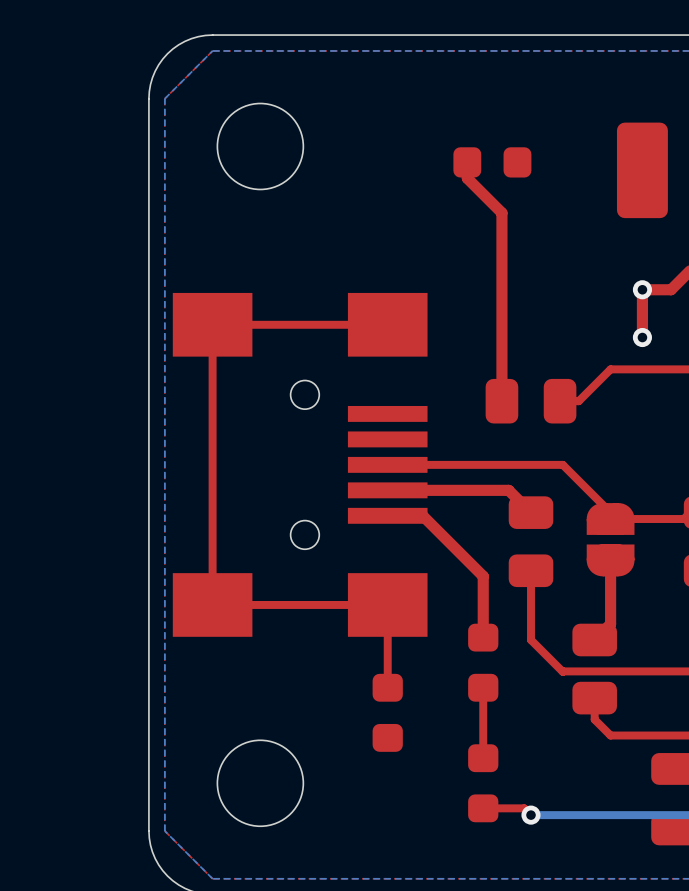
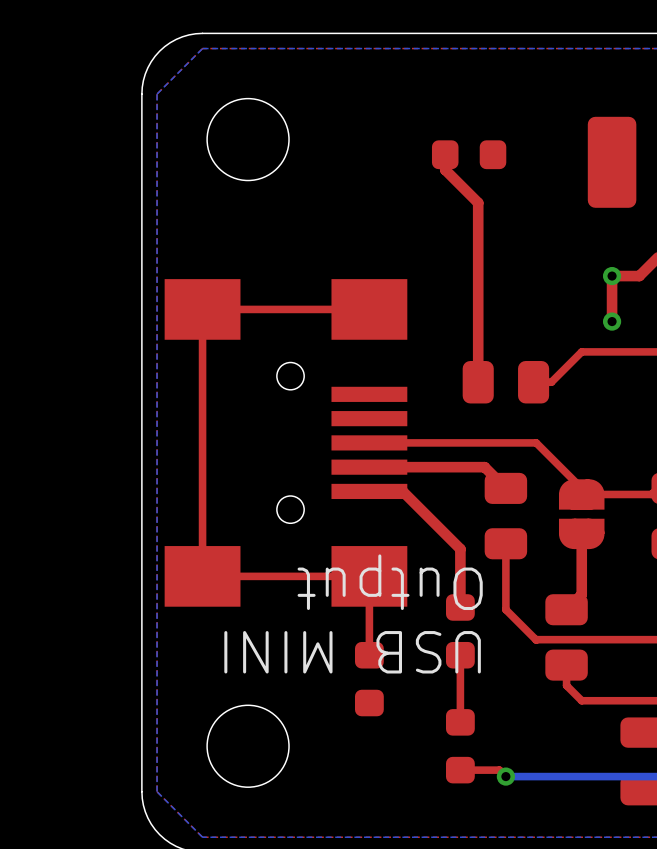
text: none -> Output (390, 582)
text: none -> USB MINI (352, 652)

